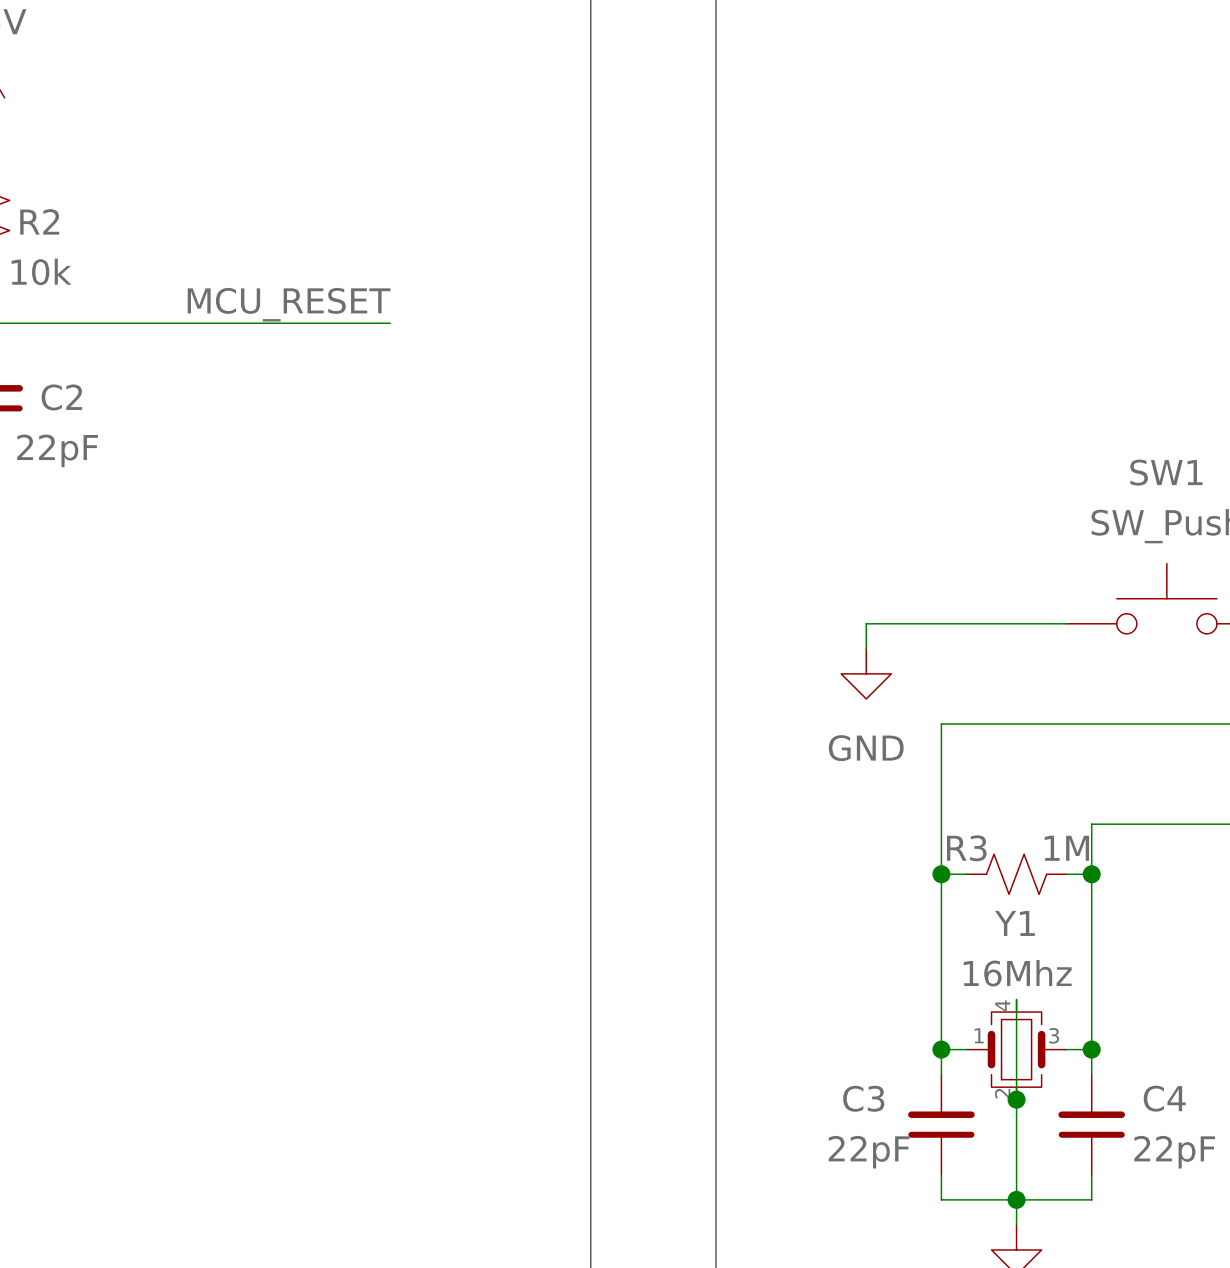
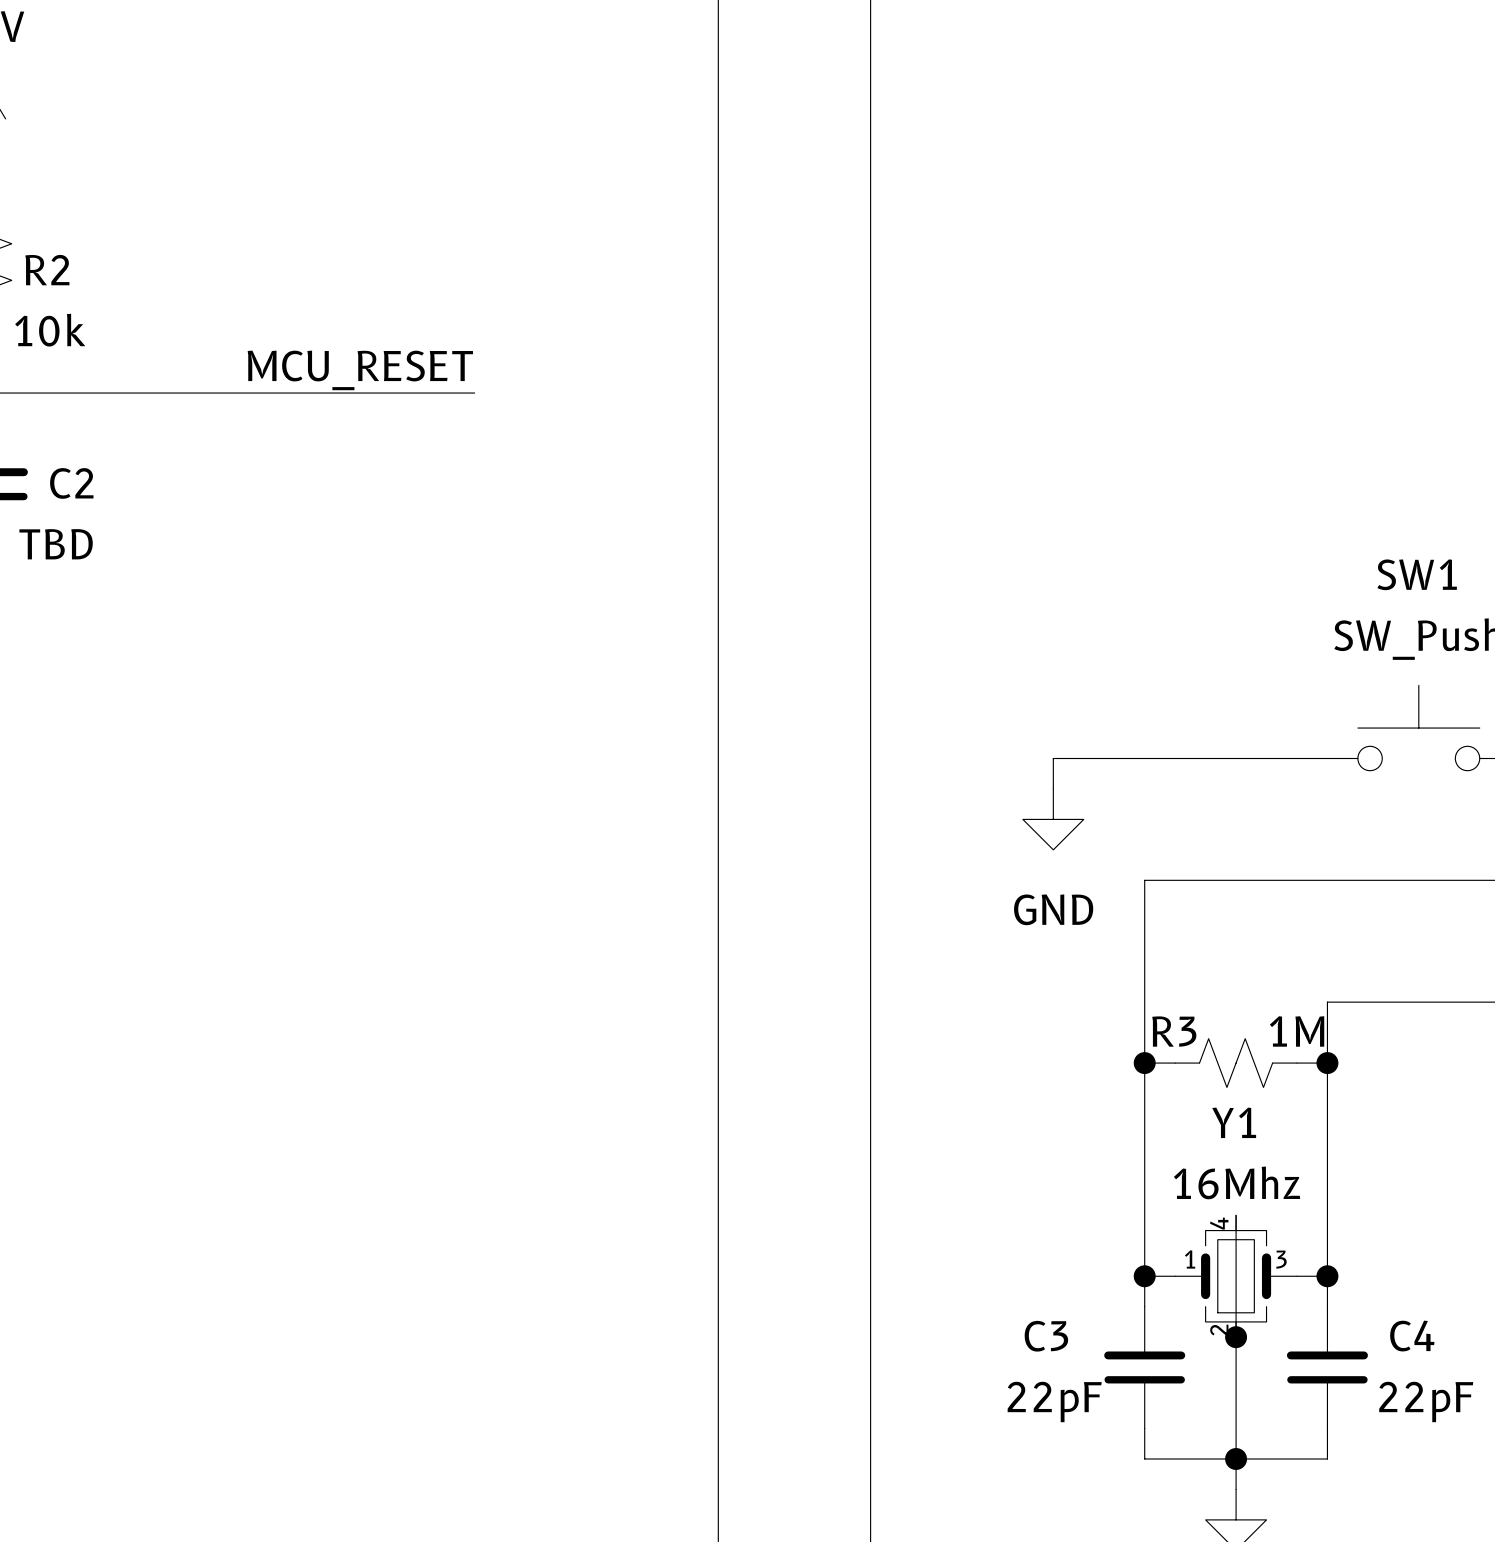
C2 value: 22pF (57, 450) -> TBD (56, 544)

